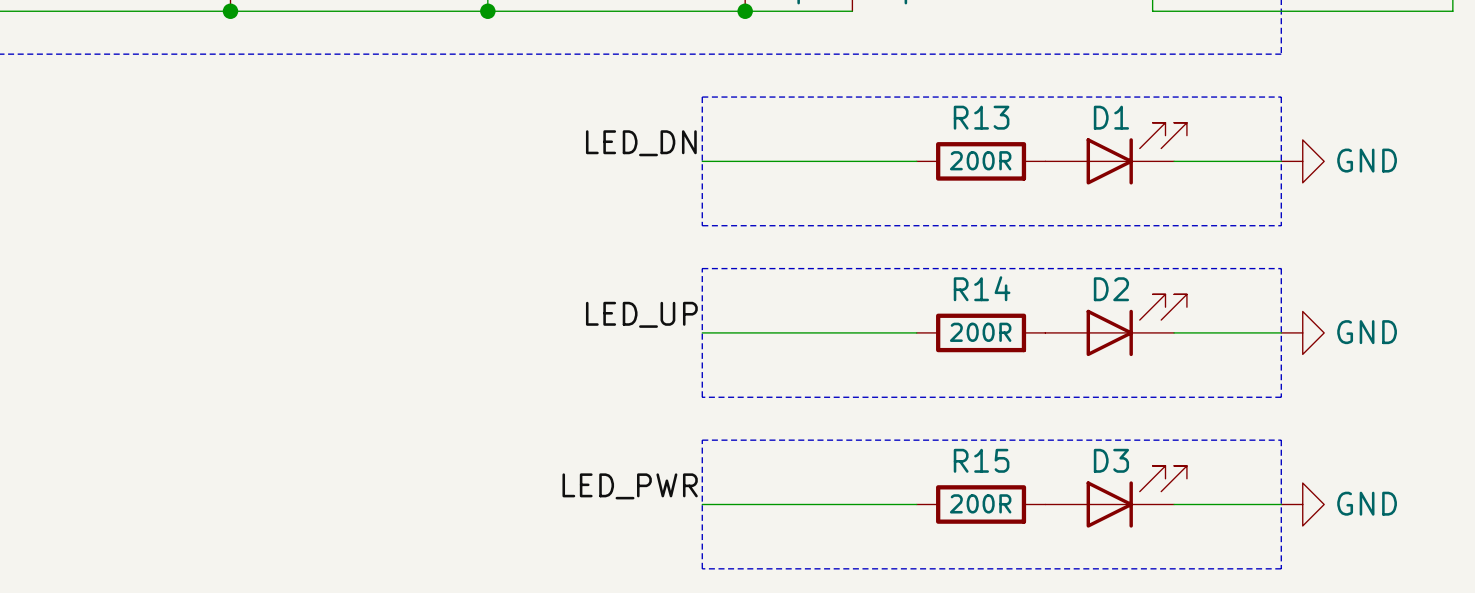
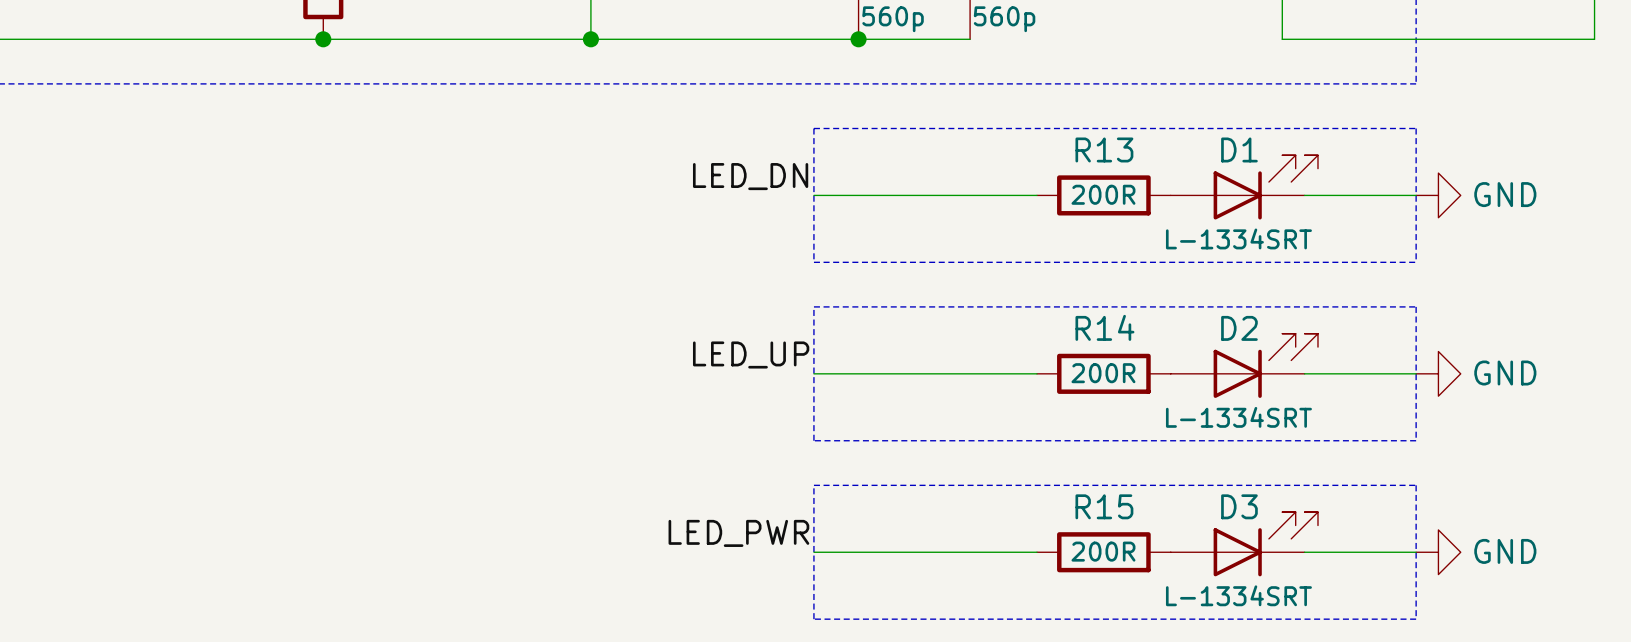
D1 value: none -> L-1334SRT (1238, 238)
D2 value: none -> L-1334SRT (1238, 417)
D3 value: none -> L-1334SRT (1238, 595)

